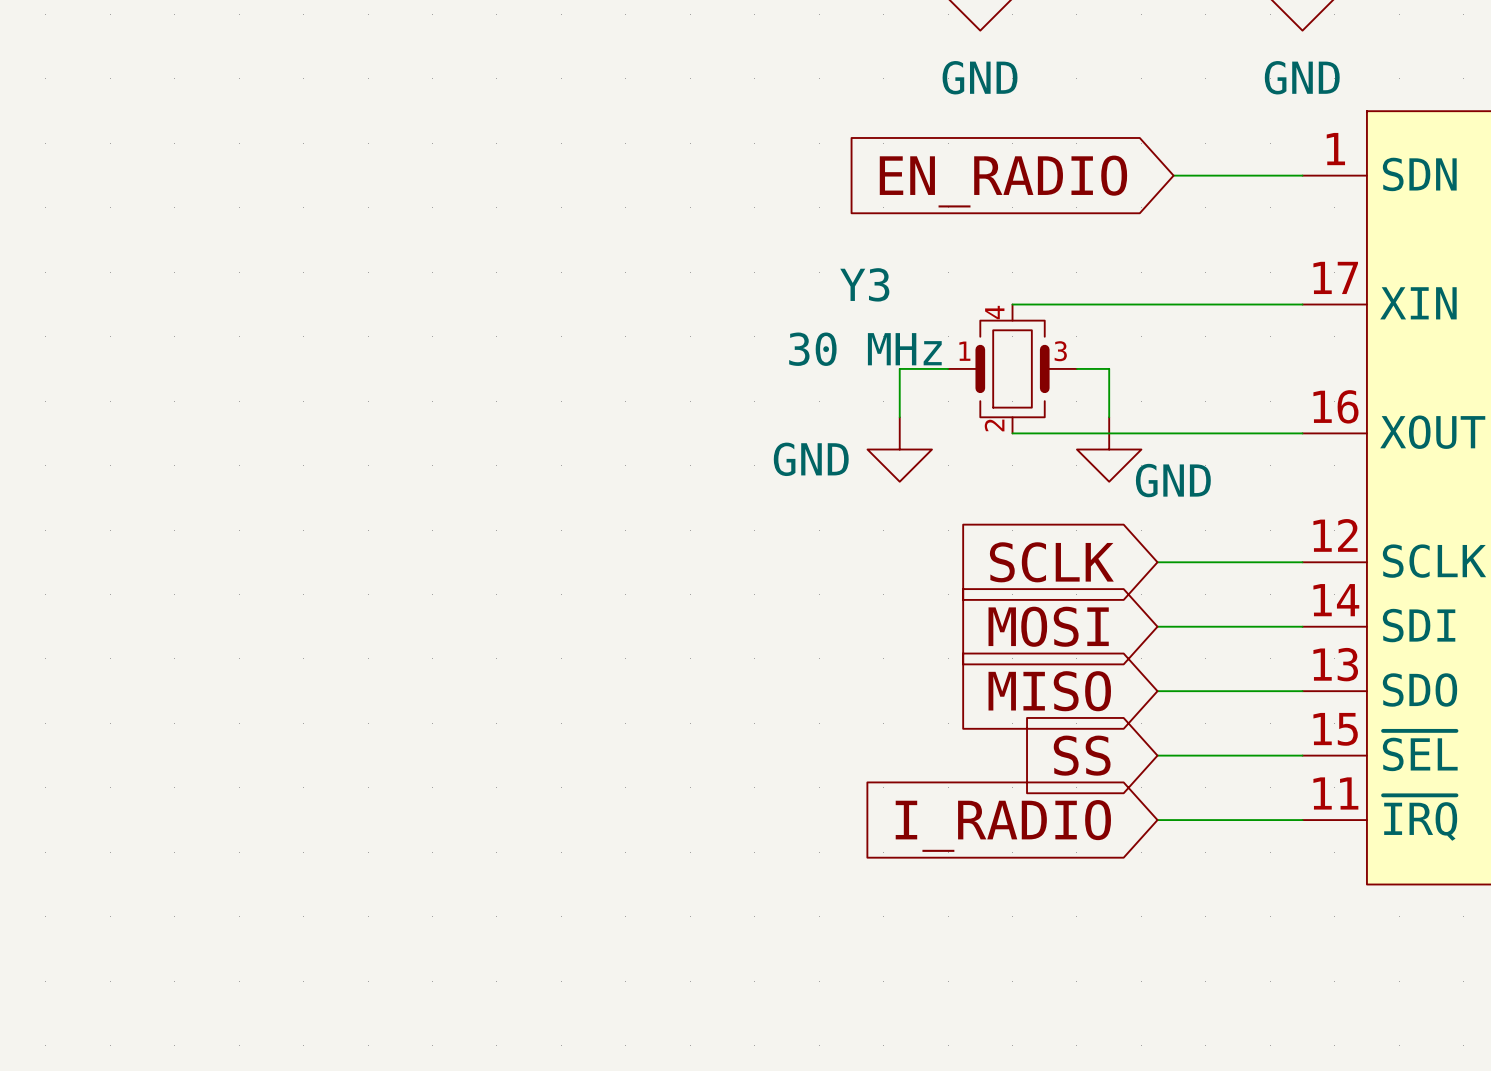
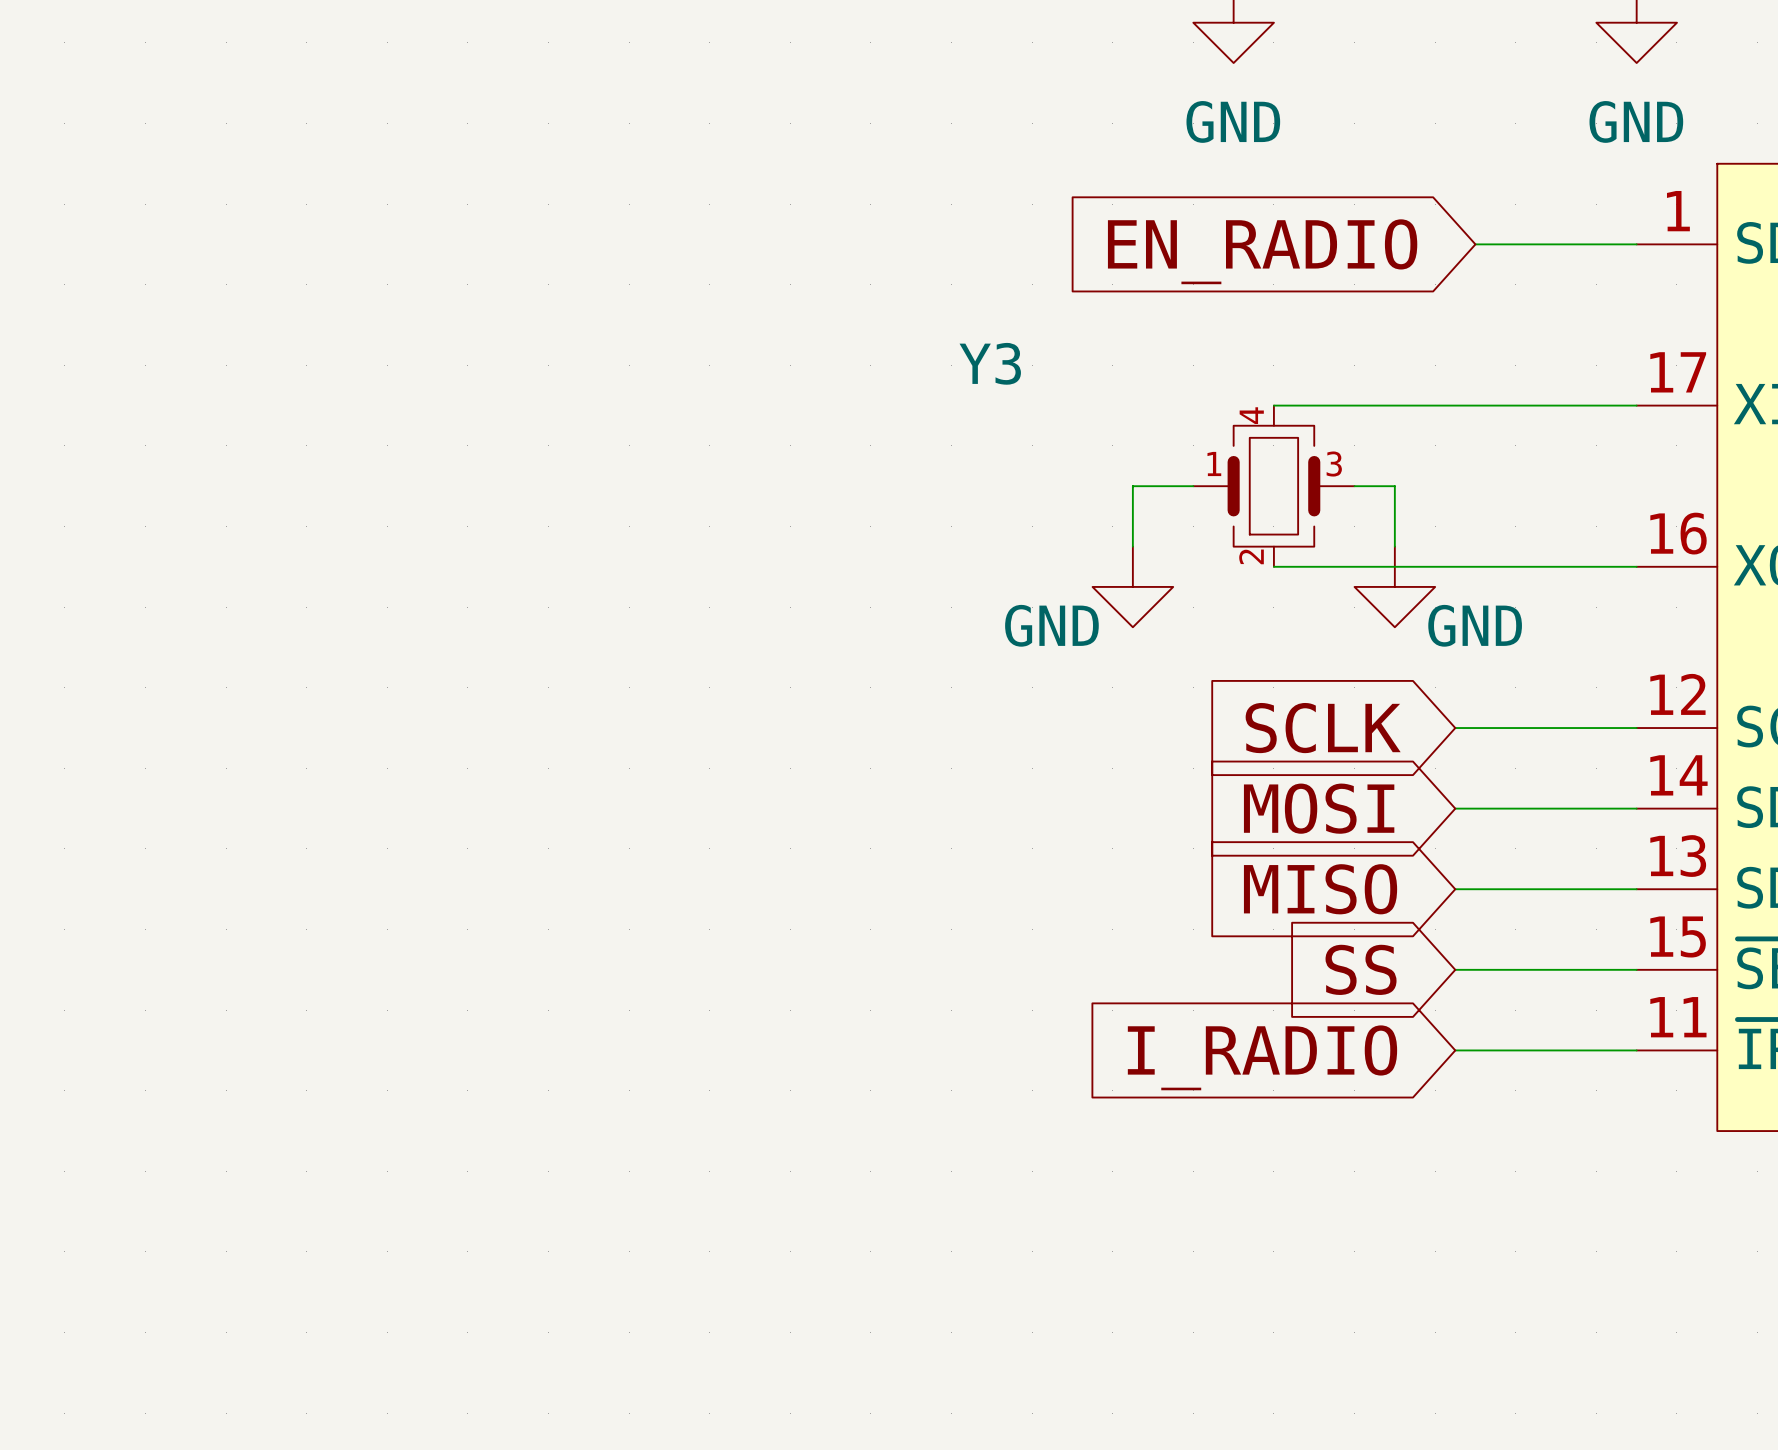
Y3 name position: Y3 (864, 284) -> Y3 (990, 363)
Y3 value: 30 MHz (865, 349) -> none
power symbol text position: GND (811, 459) -> GND (1051, 625)

